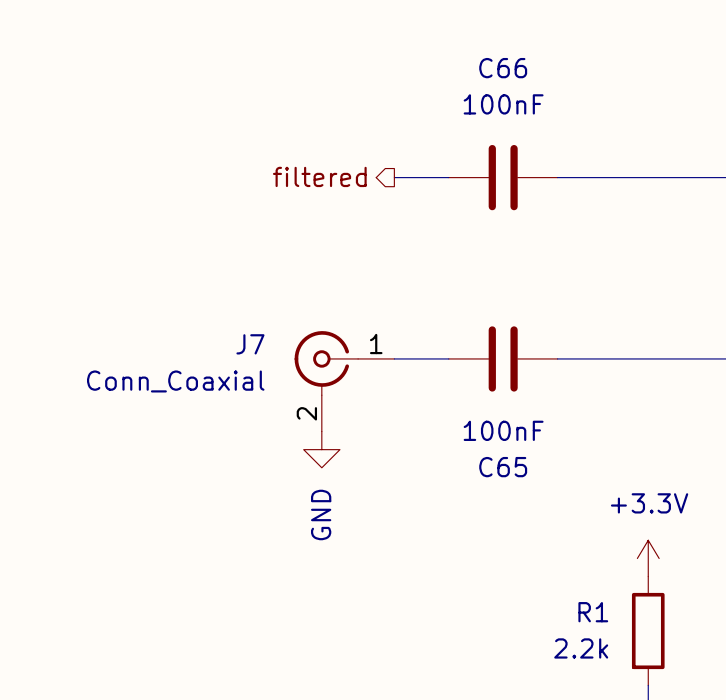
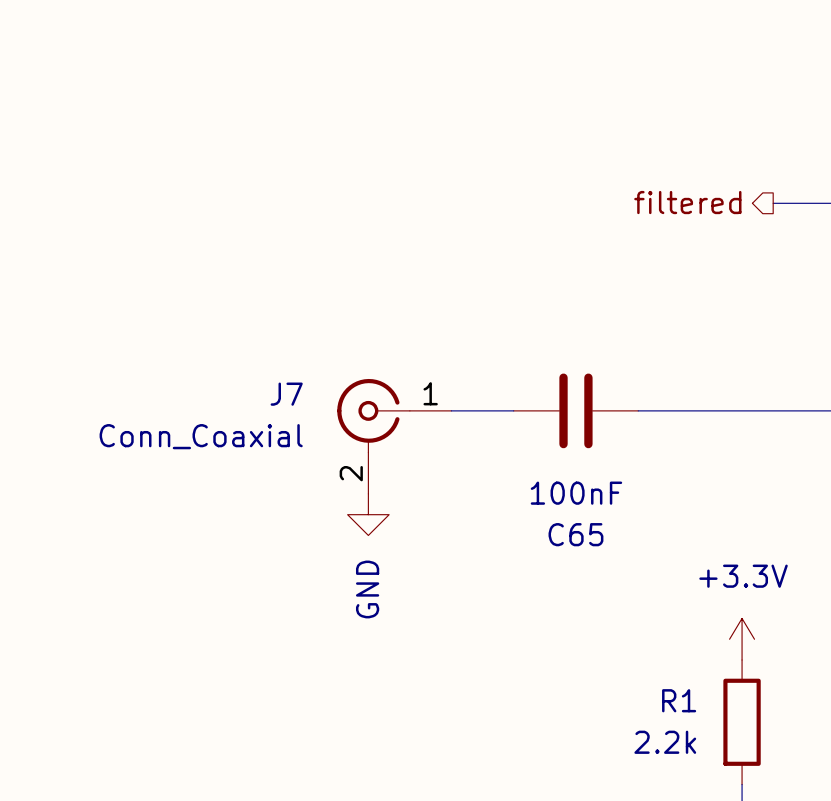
hierarchical label position: filtered (319, 176) -> filtered (687, 202)
wire: (394, 177) (448, 177) -> none
C66: 100nF (503, 177) -> none
wire: (557, 177) (675, 177) -> none

